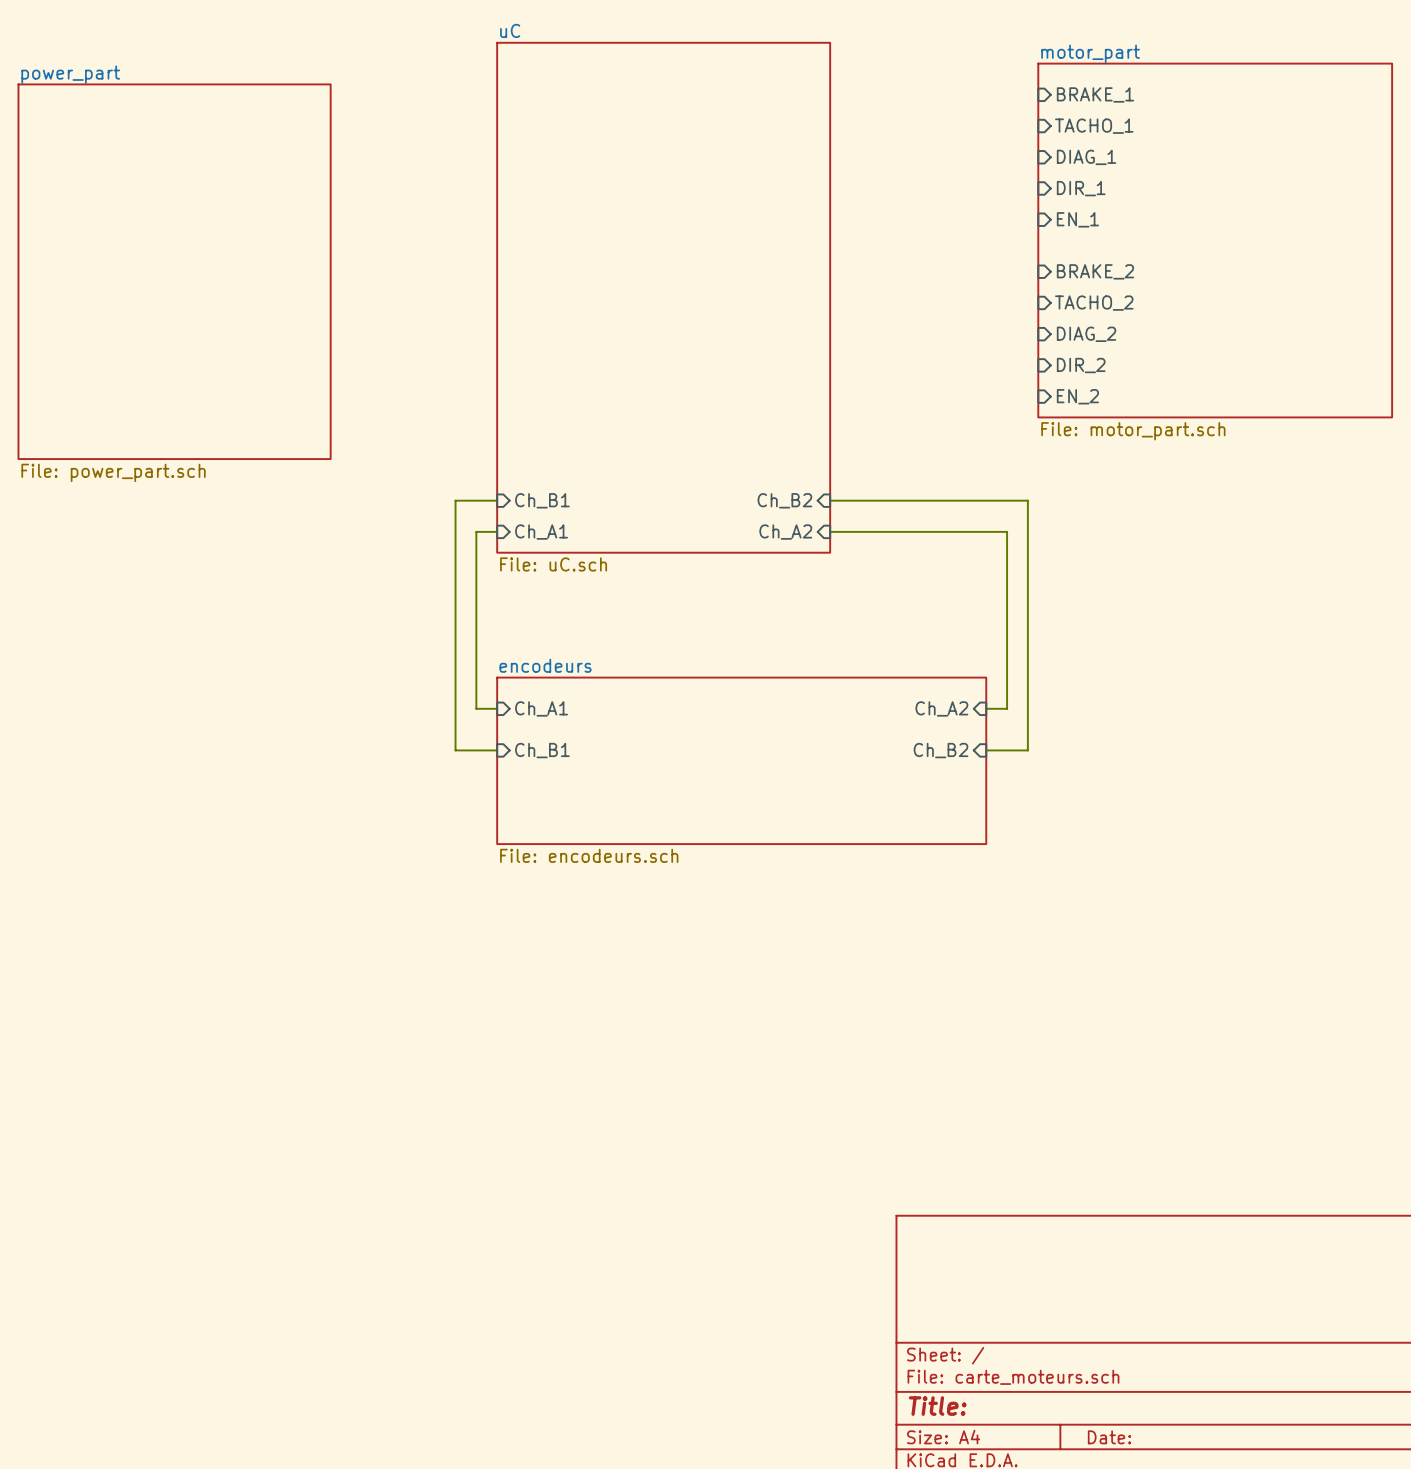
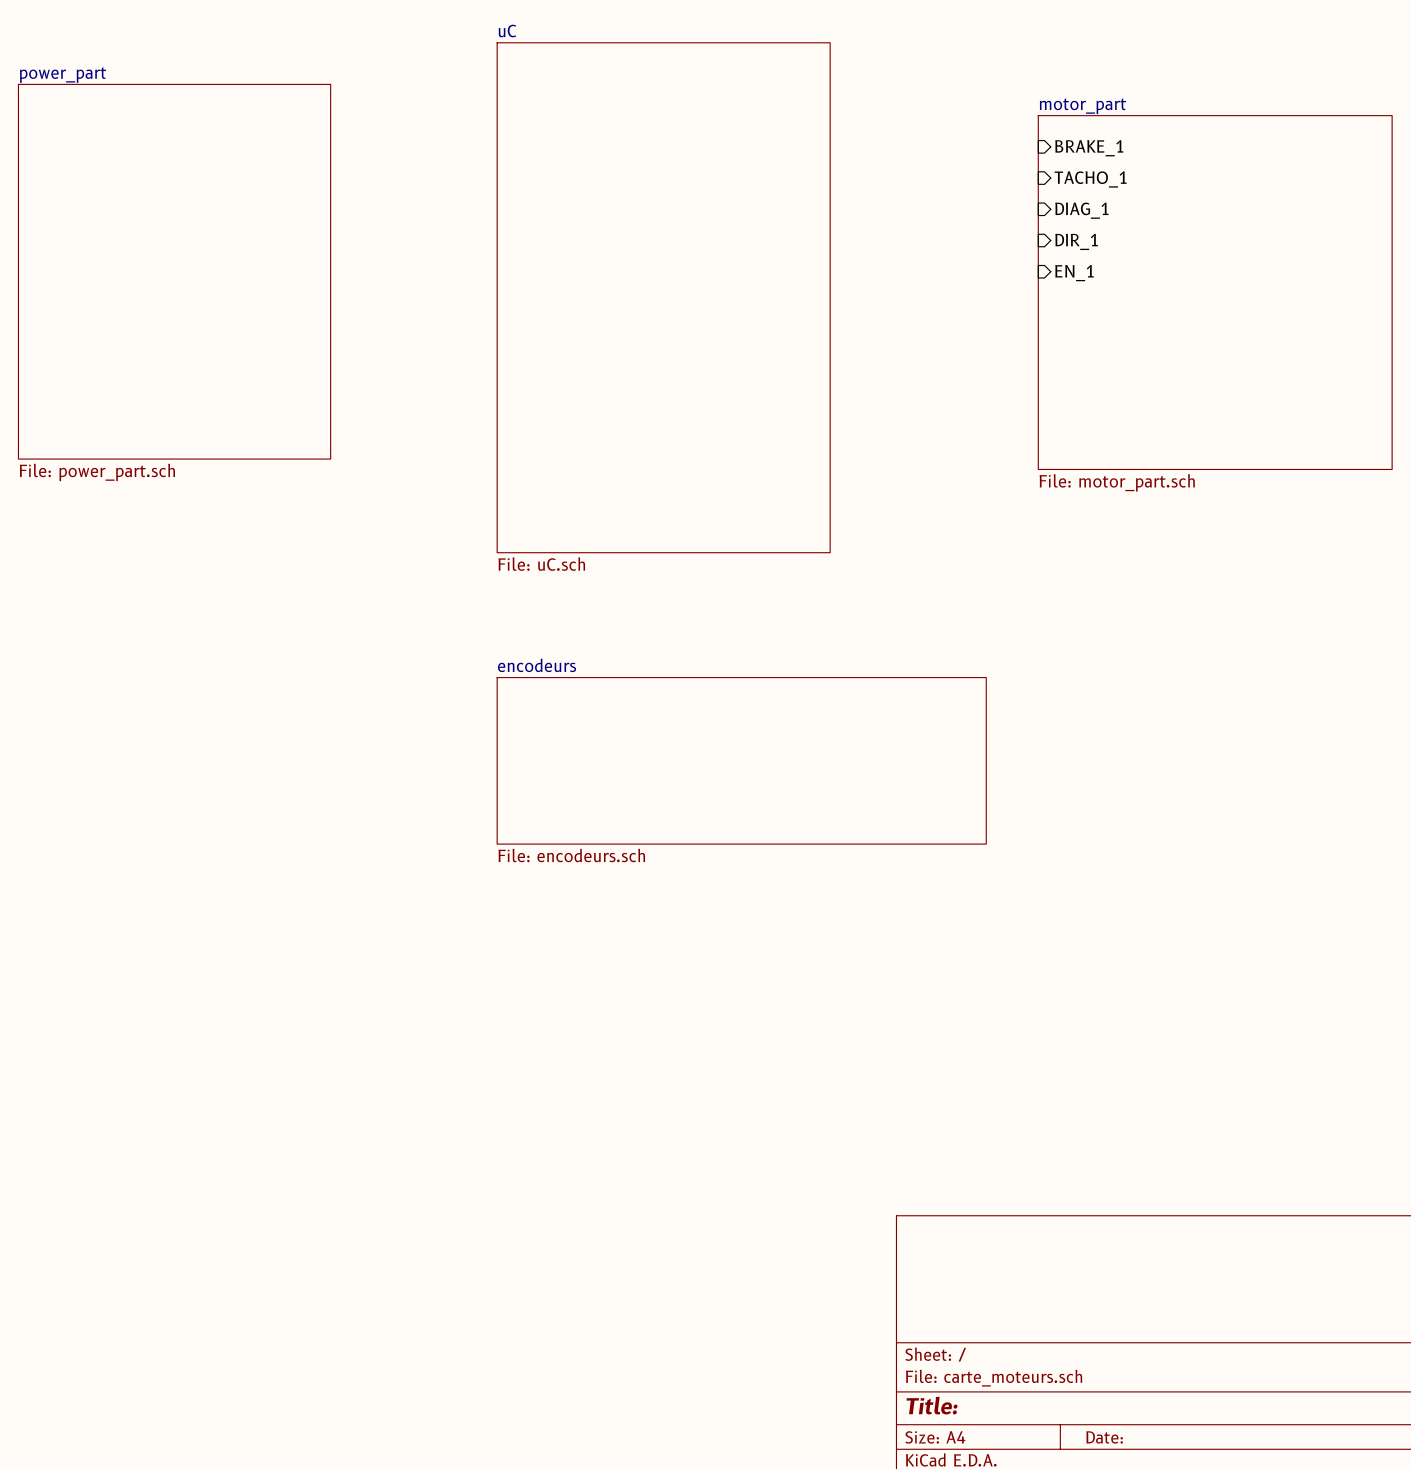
sheet pin position: BRAKE_1 (1095, 94) -> BRAKE_1 (1089, 148)
sheet pin position: TACHO_1 (1094, 126) -> TACHO_1 (1090, 179)
sheet pin position: DIAG_1 (1086, 157) -> DIAG_1 (1081, 210)
sheet pin position: DIR_1 (1081, 188) -> DIR_1 (1076, 241)
sheet pin: EN_1 (1077, 219) -> none
sheet motor_part position: (1215, 240) -> (1215, 292)
sheet pin: BRAKE_2 (1095, 271) -> EN_1 (1074, 273)
sheet pin: TACHO_2 (1094, 303) -> none
sheet pin: DIAG_2 (1086, 334) -> none
sheet pin: DIR_2 (1081, 365) -> none
sheet pin: EN_2 (1077, 396) -> none
wire: (497, 500) (455, 500) (455, 750) (497, 750) -> none
sheet pin: Ch_B1 (542, 500) -> none
sheet pin: Ch_B2 (784, 500) -> none
wire: (830, 500) (1027, 500) (1027, 750) (986, 750) -> none
wire: (497, 531) (476, 531) (476, 708) (497, 708) -> none
wire: (830, 531) (1007, 531) (1007, 708) (986, 708) -> none
sheet pin: Ch_A1 (541, 532) -> none
sheet pin: Ch_A2 (785, 532) -> none
sheet pin: Ch_A1 (541, 708) -> none
sheet pin: Ch_A2 (941, 708) -> none
sheet pin: Ch_B1 (542, 750) -> none
sheet pin: Ch_B2 (940, 750) -> none

